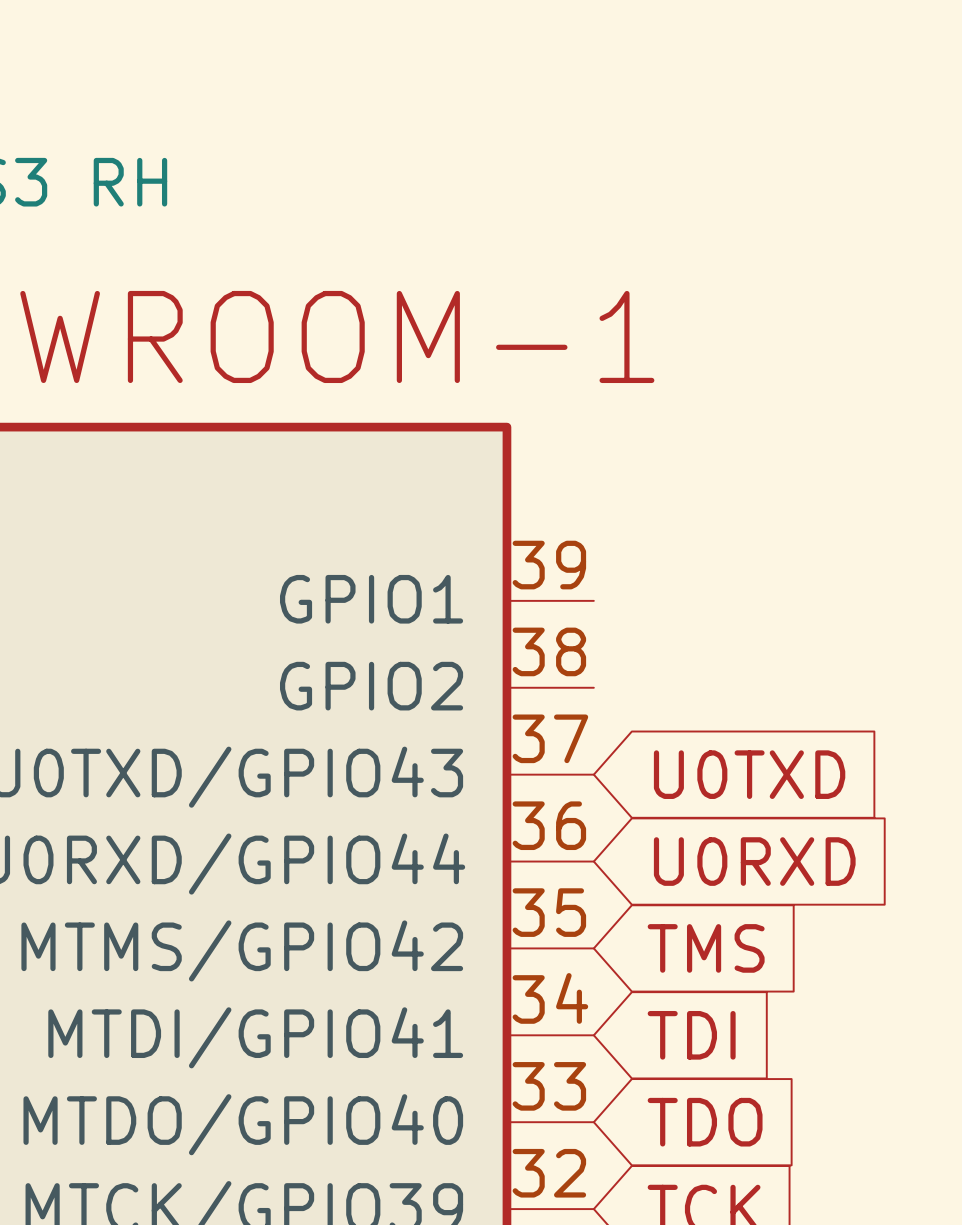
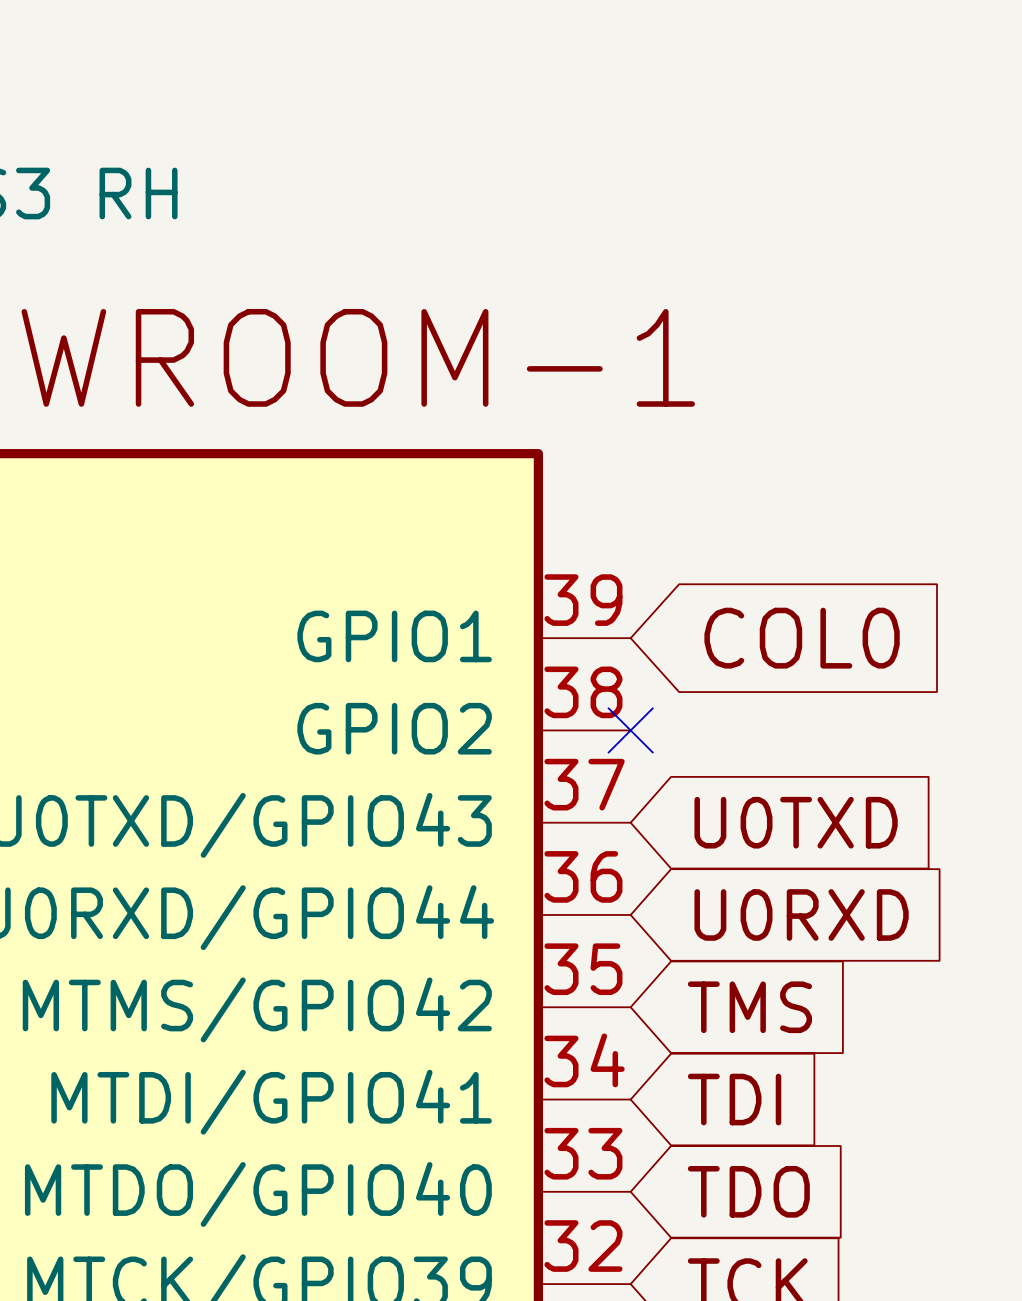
global label: none -> COL0 (802, 638)
no-connect mark: none -> (630, 730)

